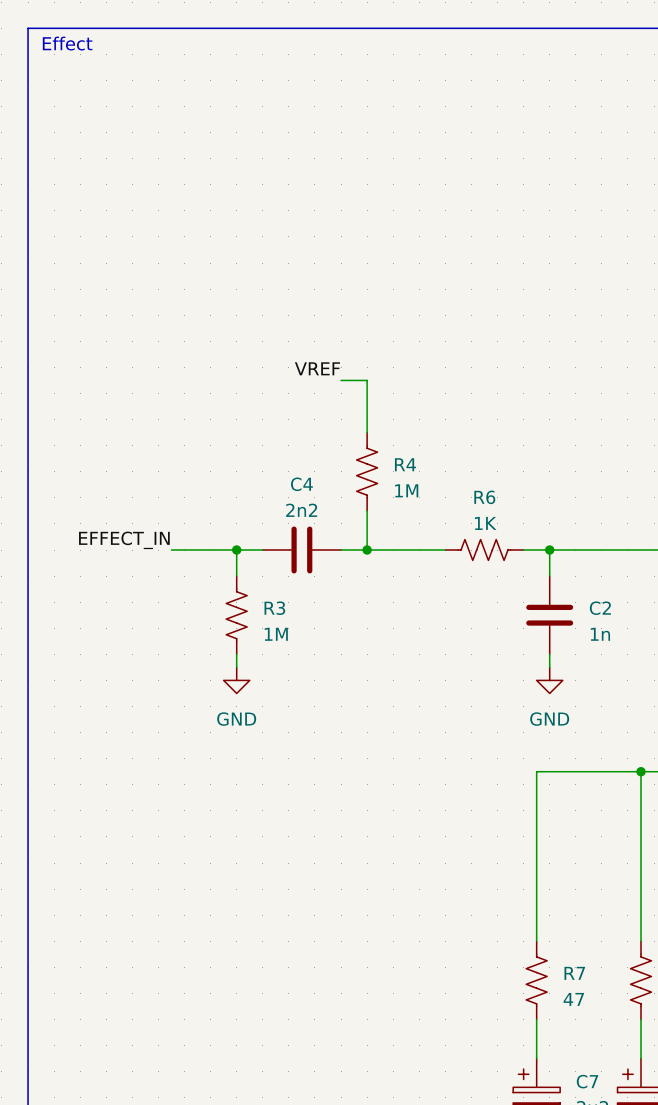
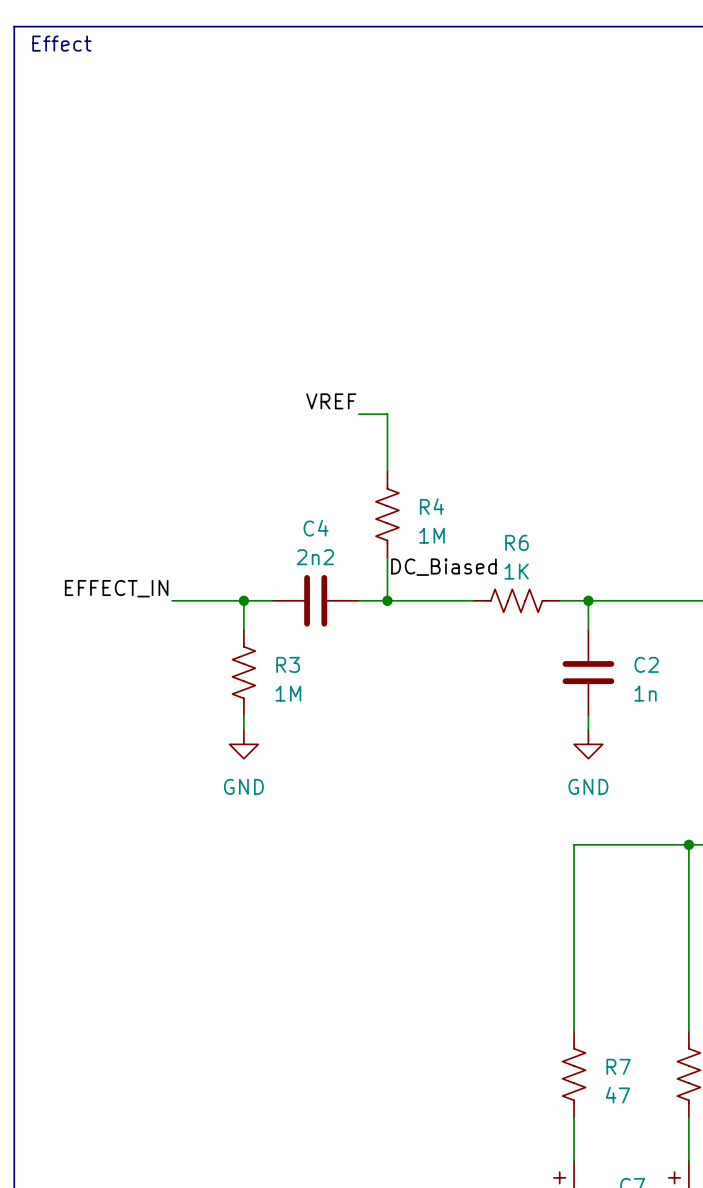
label: none -> DC_Biased (443, 567)

